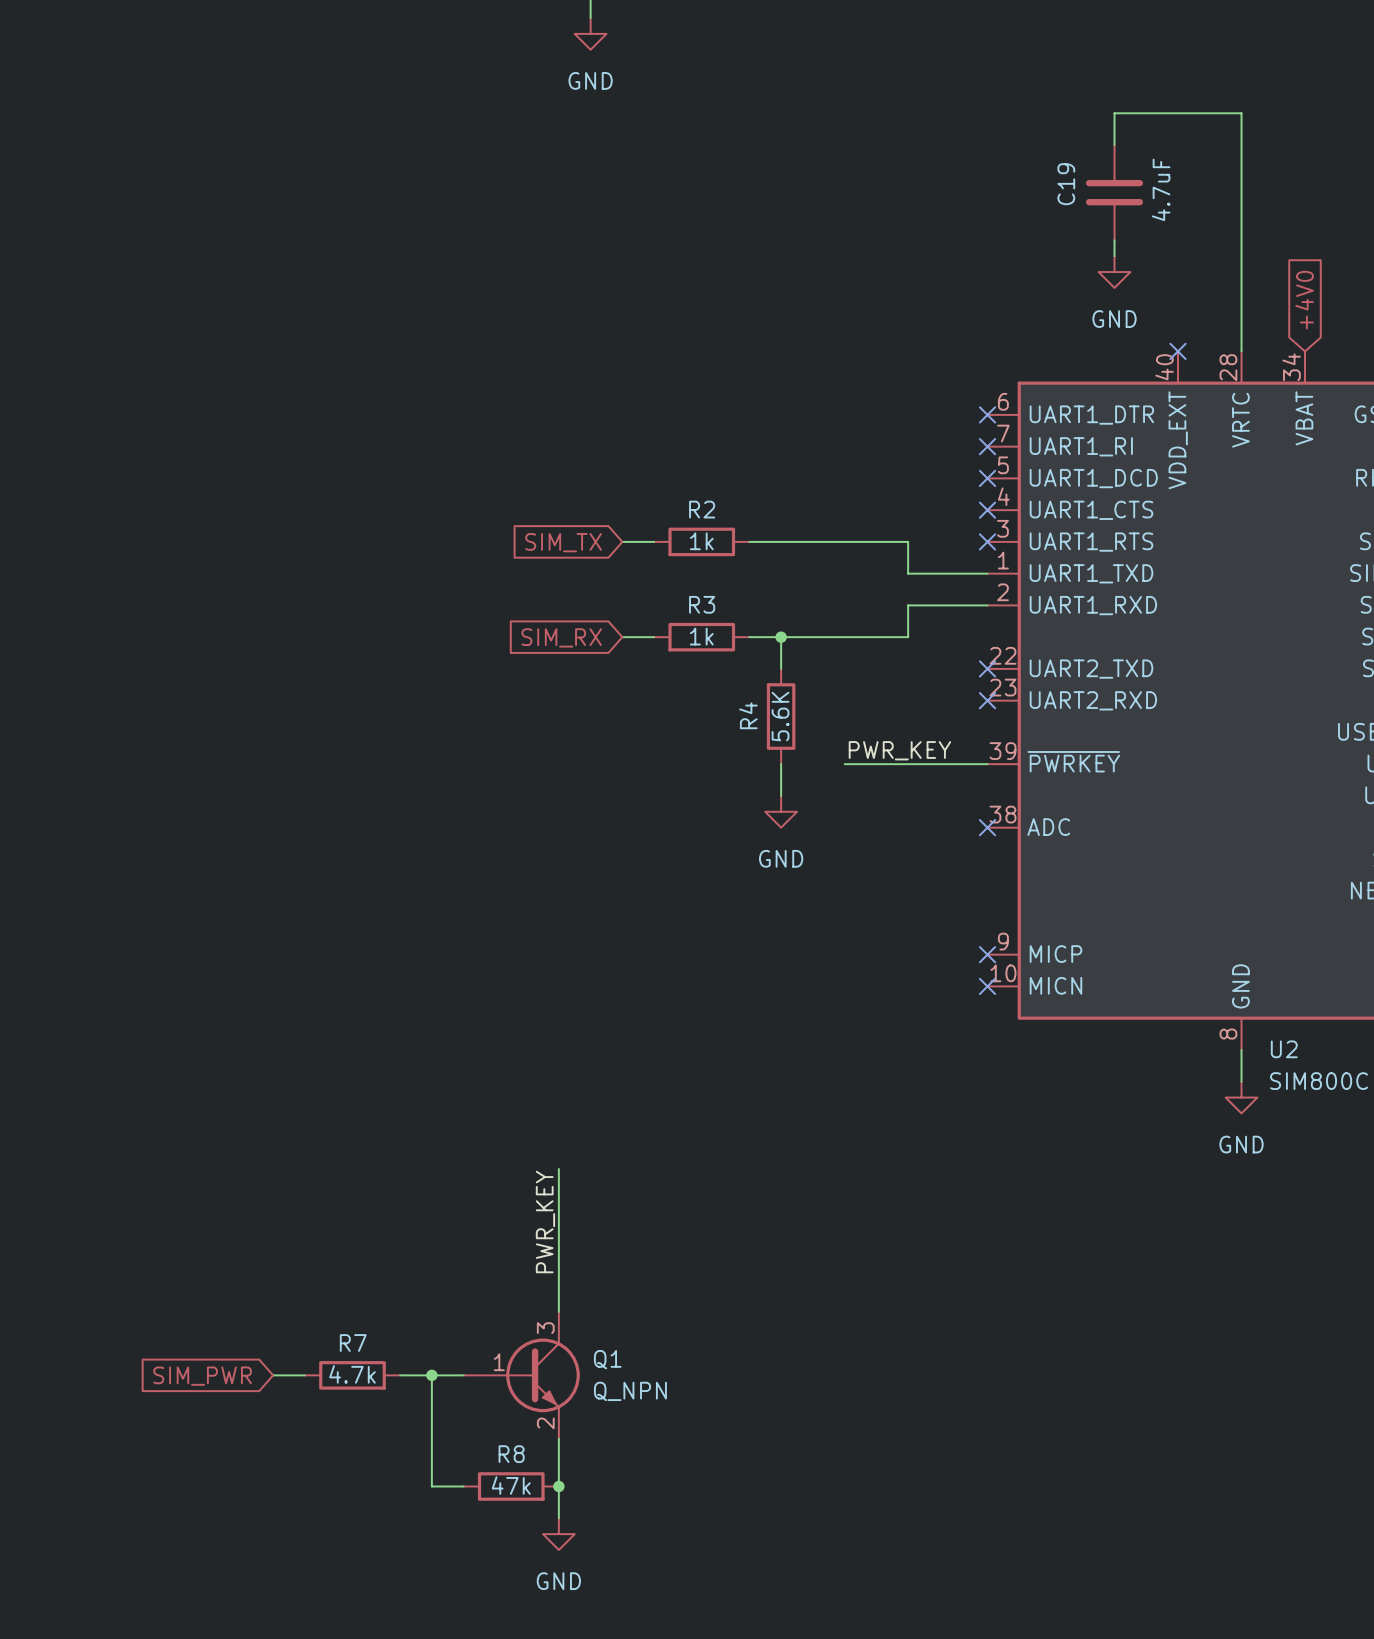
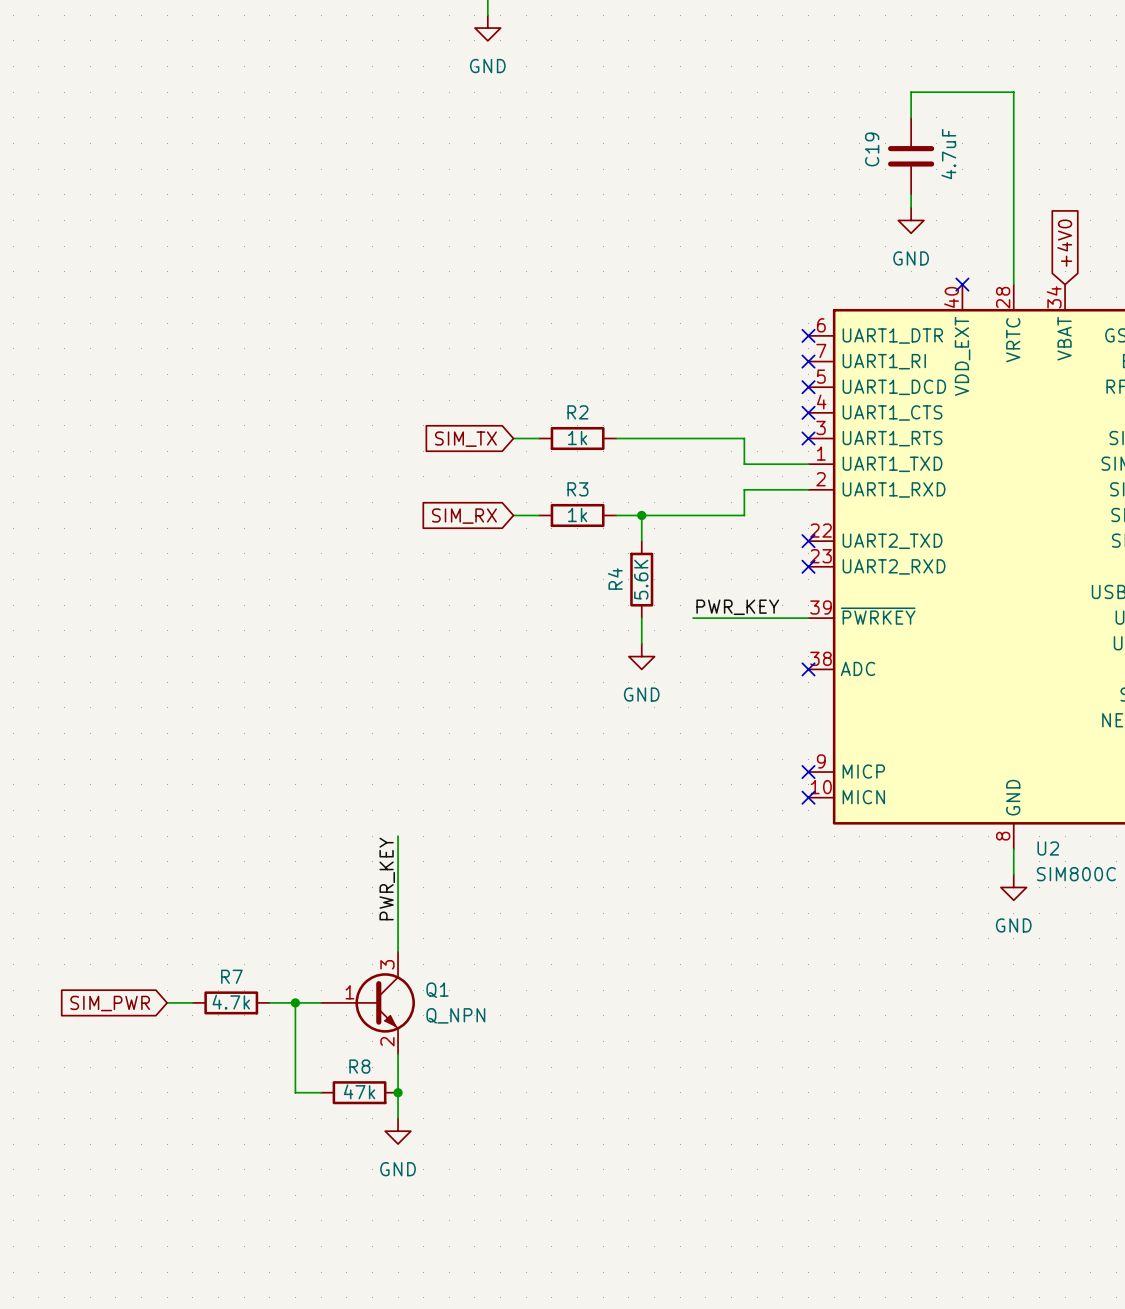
wire: (558, 1168) (558, 1311) -> (398, 836) (398, 951)
label position: PWR_KEY (545, 1222) -> PWR_KEY (387, 879)
junction: none -> (295, 1002)
wire: (273, 1375) (304, 1375) -> (167, 1002) (192, 1002)
R7 position: (352, 1375) -> (231, 1002)
wire: (400, 1375) (463, 1375) -> (269, 1002) (321, 1002)
wire: (431, 1375) (431, 1486) (463, 1486) -> (295, 1002) (295, 1092) (321, 1092)
junction position: (431, 1375) -> (398, 1092)
Q1 position: (521, 1375) -> (368, 1002)
global label position: SIM_PWR (202, 1376) -> SIM_PWR (110, 1003)
wire: (558, 1438) (558, 1518) -> (398, 1054) (398, 1118)
R8 position: (511, 1486) -> (359, 1092)
junction: (558, 1486) -> none
power symbol position: GND (558, 1534) -> GND (398, 1131)

